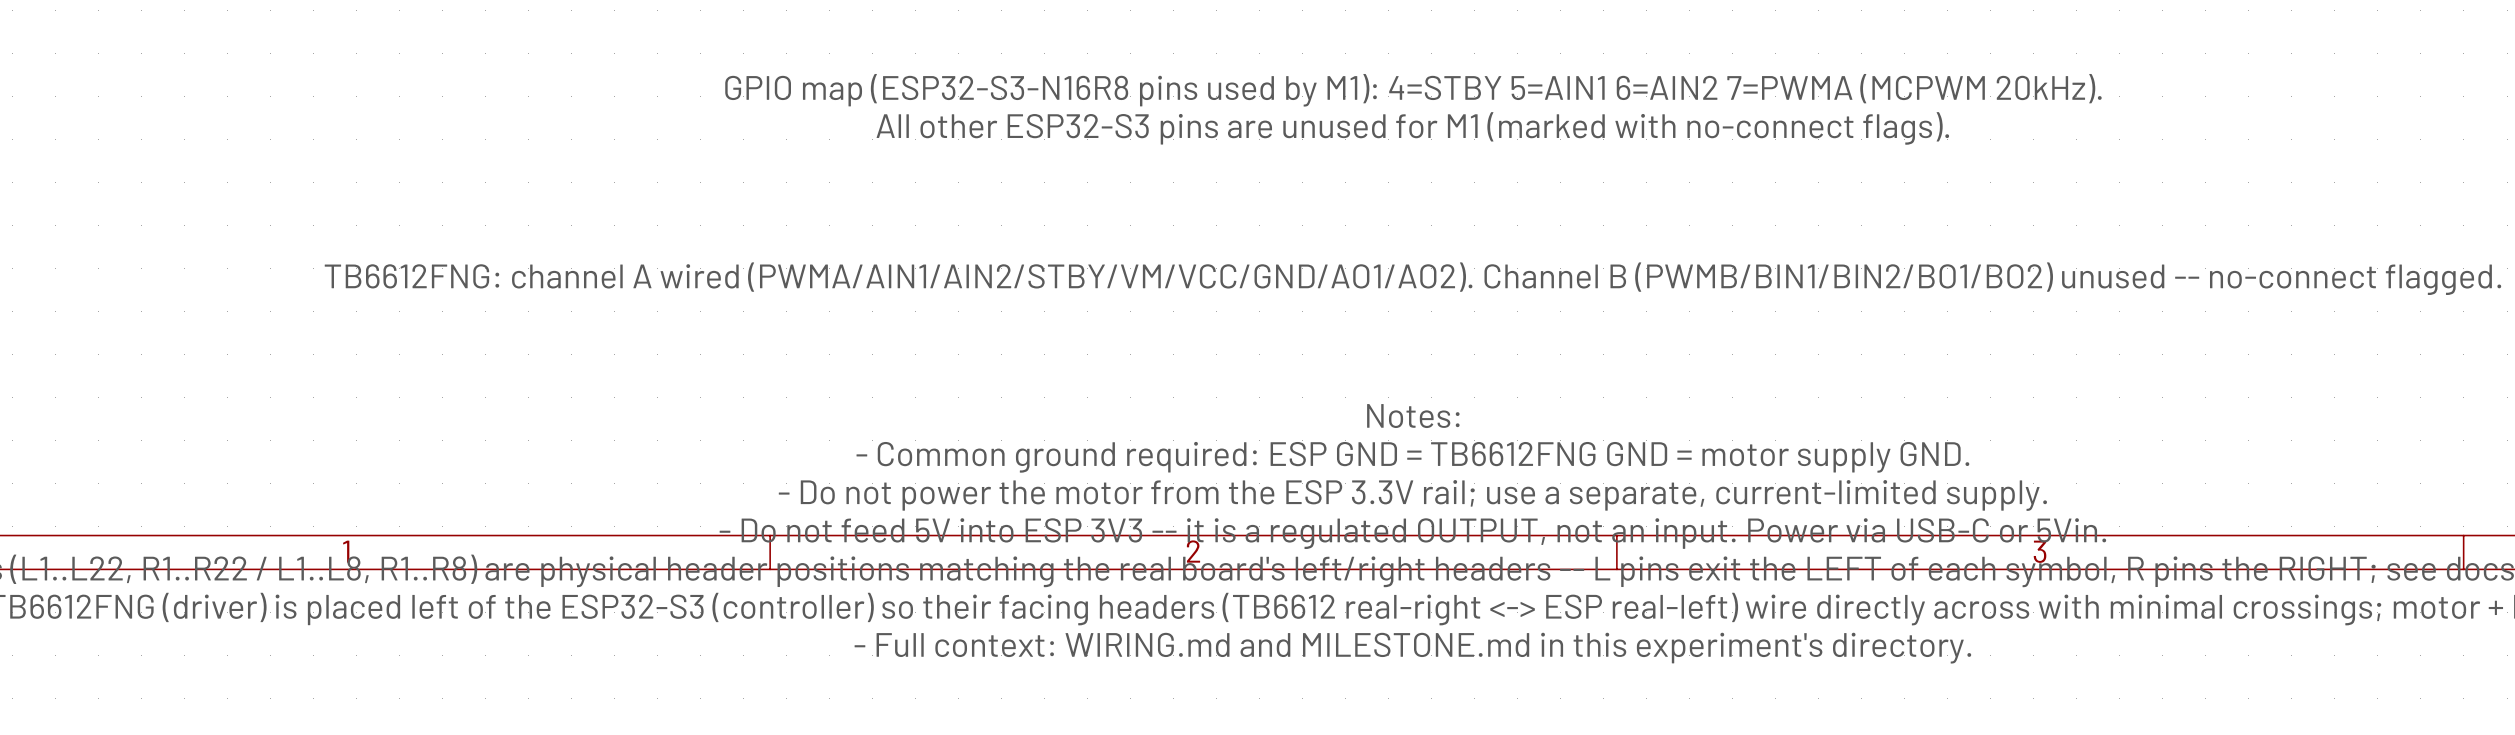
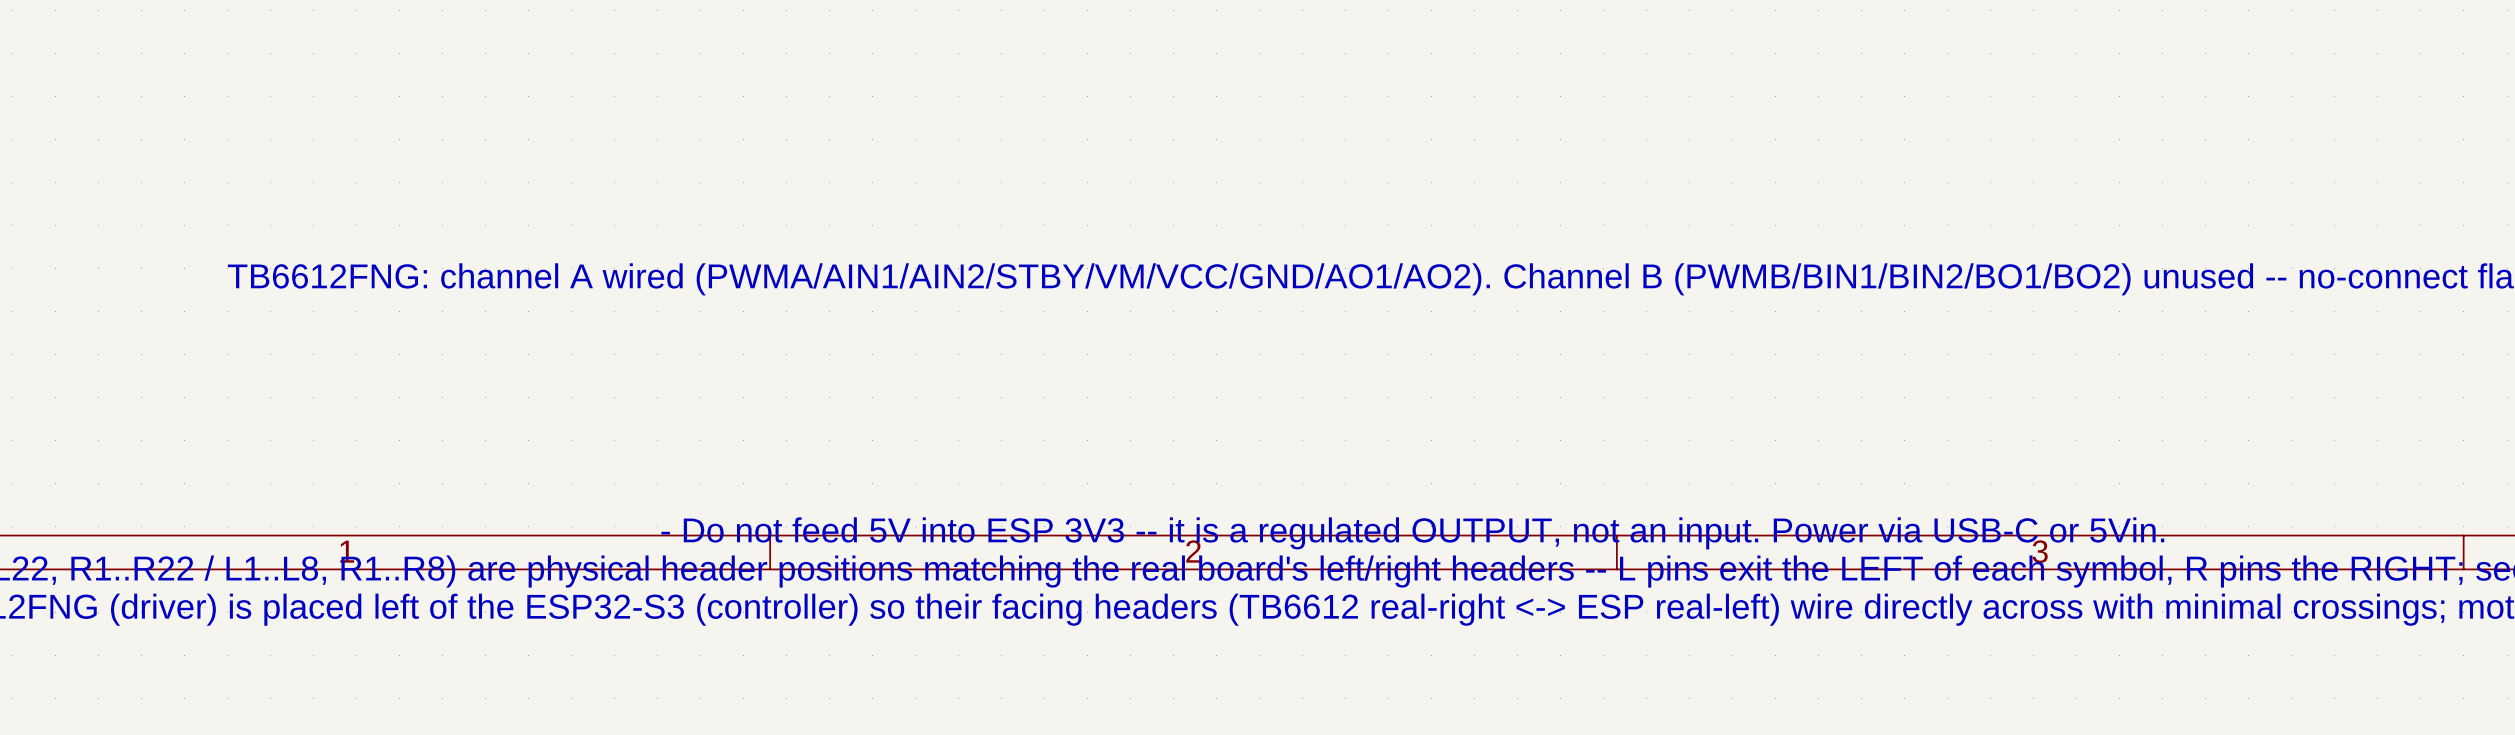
text: GPIO map (ESP32-S3-N16R8 pins used by M1): 4=STBY 5=AIN1 6=AIN2 7=PWMA (MCPWM 20kHz). (1413, 90) -> none
text: All other ESP32-S3 pins are unused for M1 (marked with no-connect flags). (1412, 128) -> none
text: Notes: (1413, 416) -> none
text: - Common ground required: ESP GND = TB6612FNG GND = motor supply GND. (1412, 457) -> none
text: - Do not power the motor from the ESP 3.3V rail; use a separate, current-limited supply. (1412, 495) -> none
text: - Full context: WIRING.md and MILESTONE.md in this experiment's directory. (1412, 648) -> none

